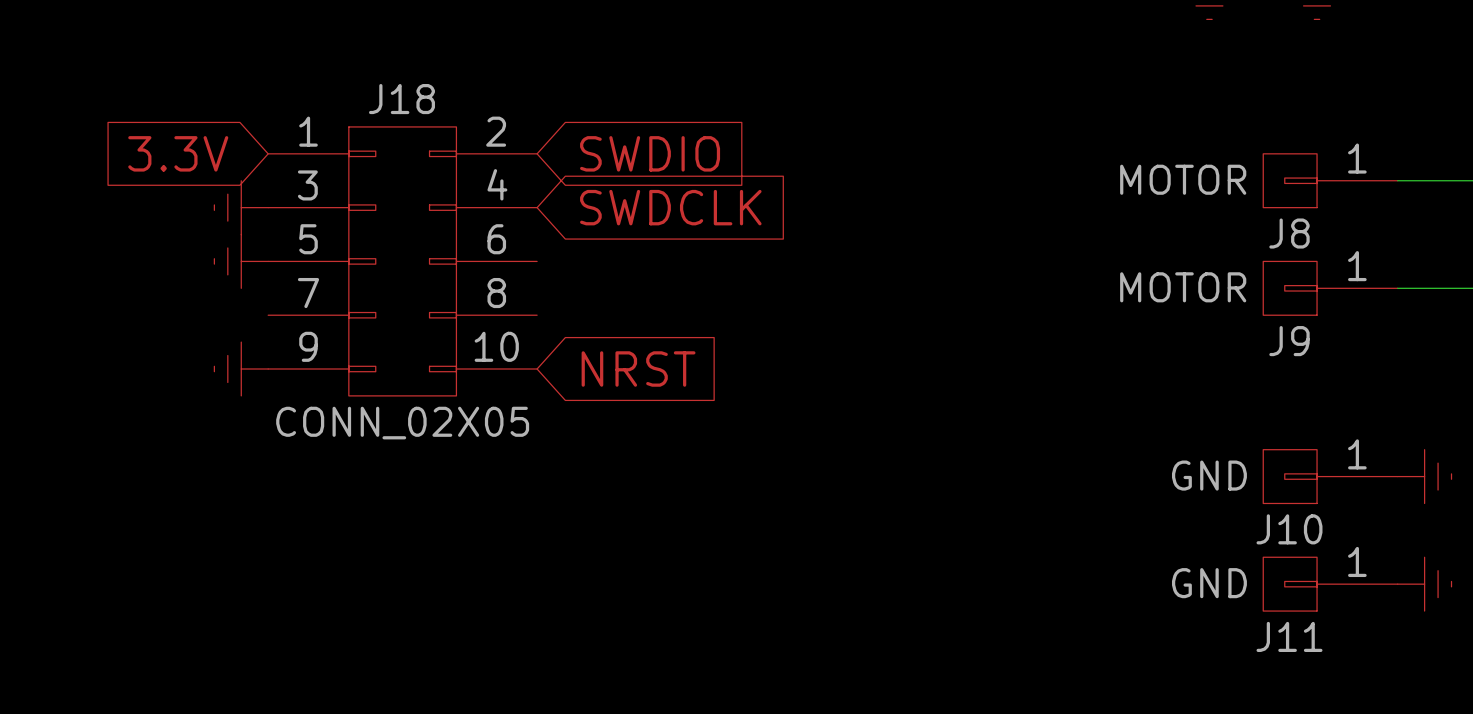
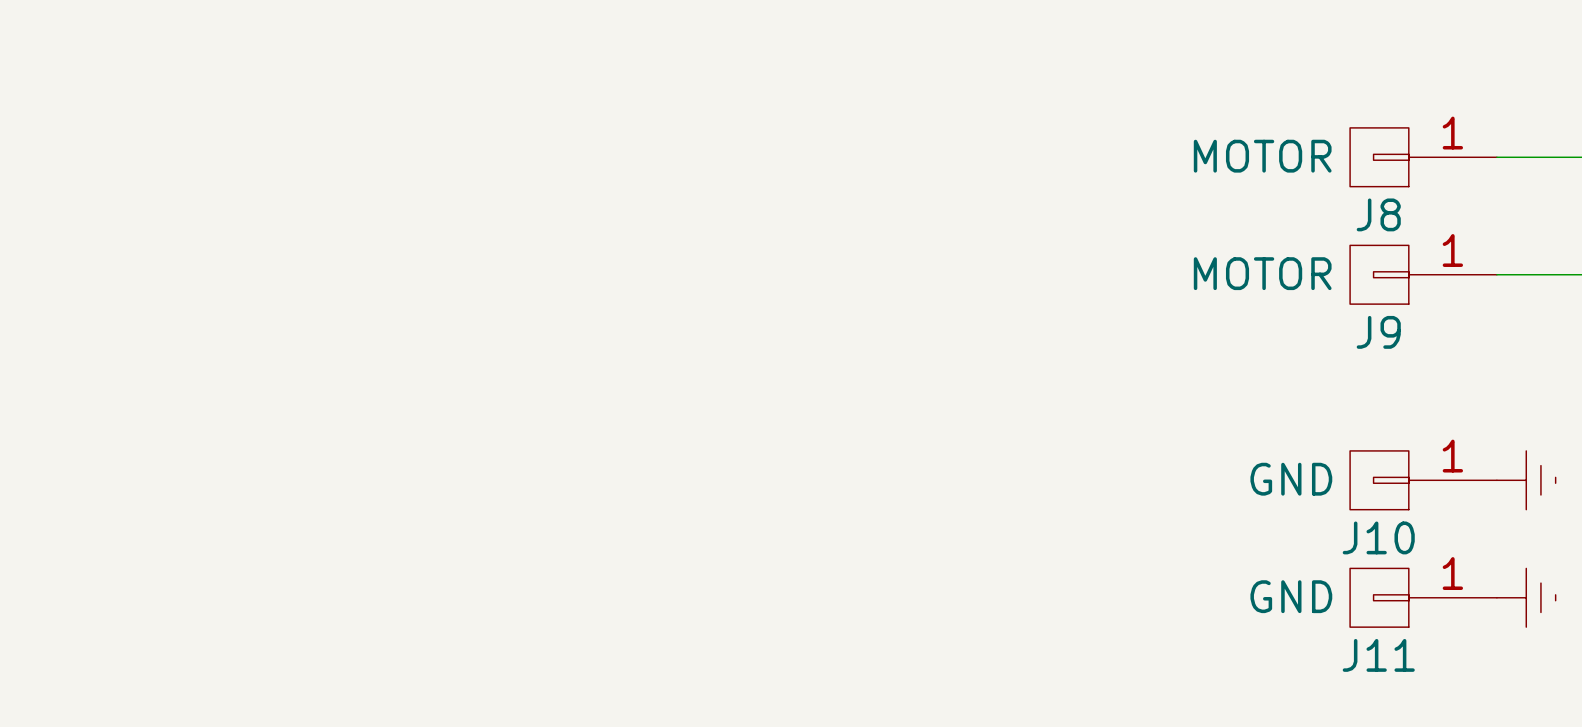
global label: 3.3V (178, 153) -> none
global label: SWDIO (650, 153) -> none
power symbol: (241, 207) -> none
global label: SWDCLK (670, 207) -> none
power symbol: (241, 261) -> none
J18: CONN_02X05 (402, 261) -> none
power symbol: (241, 369) -> none
global label: NRST (638, 369) -> none

